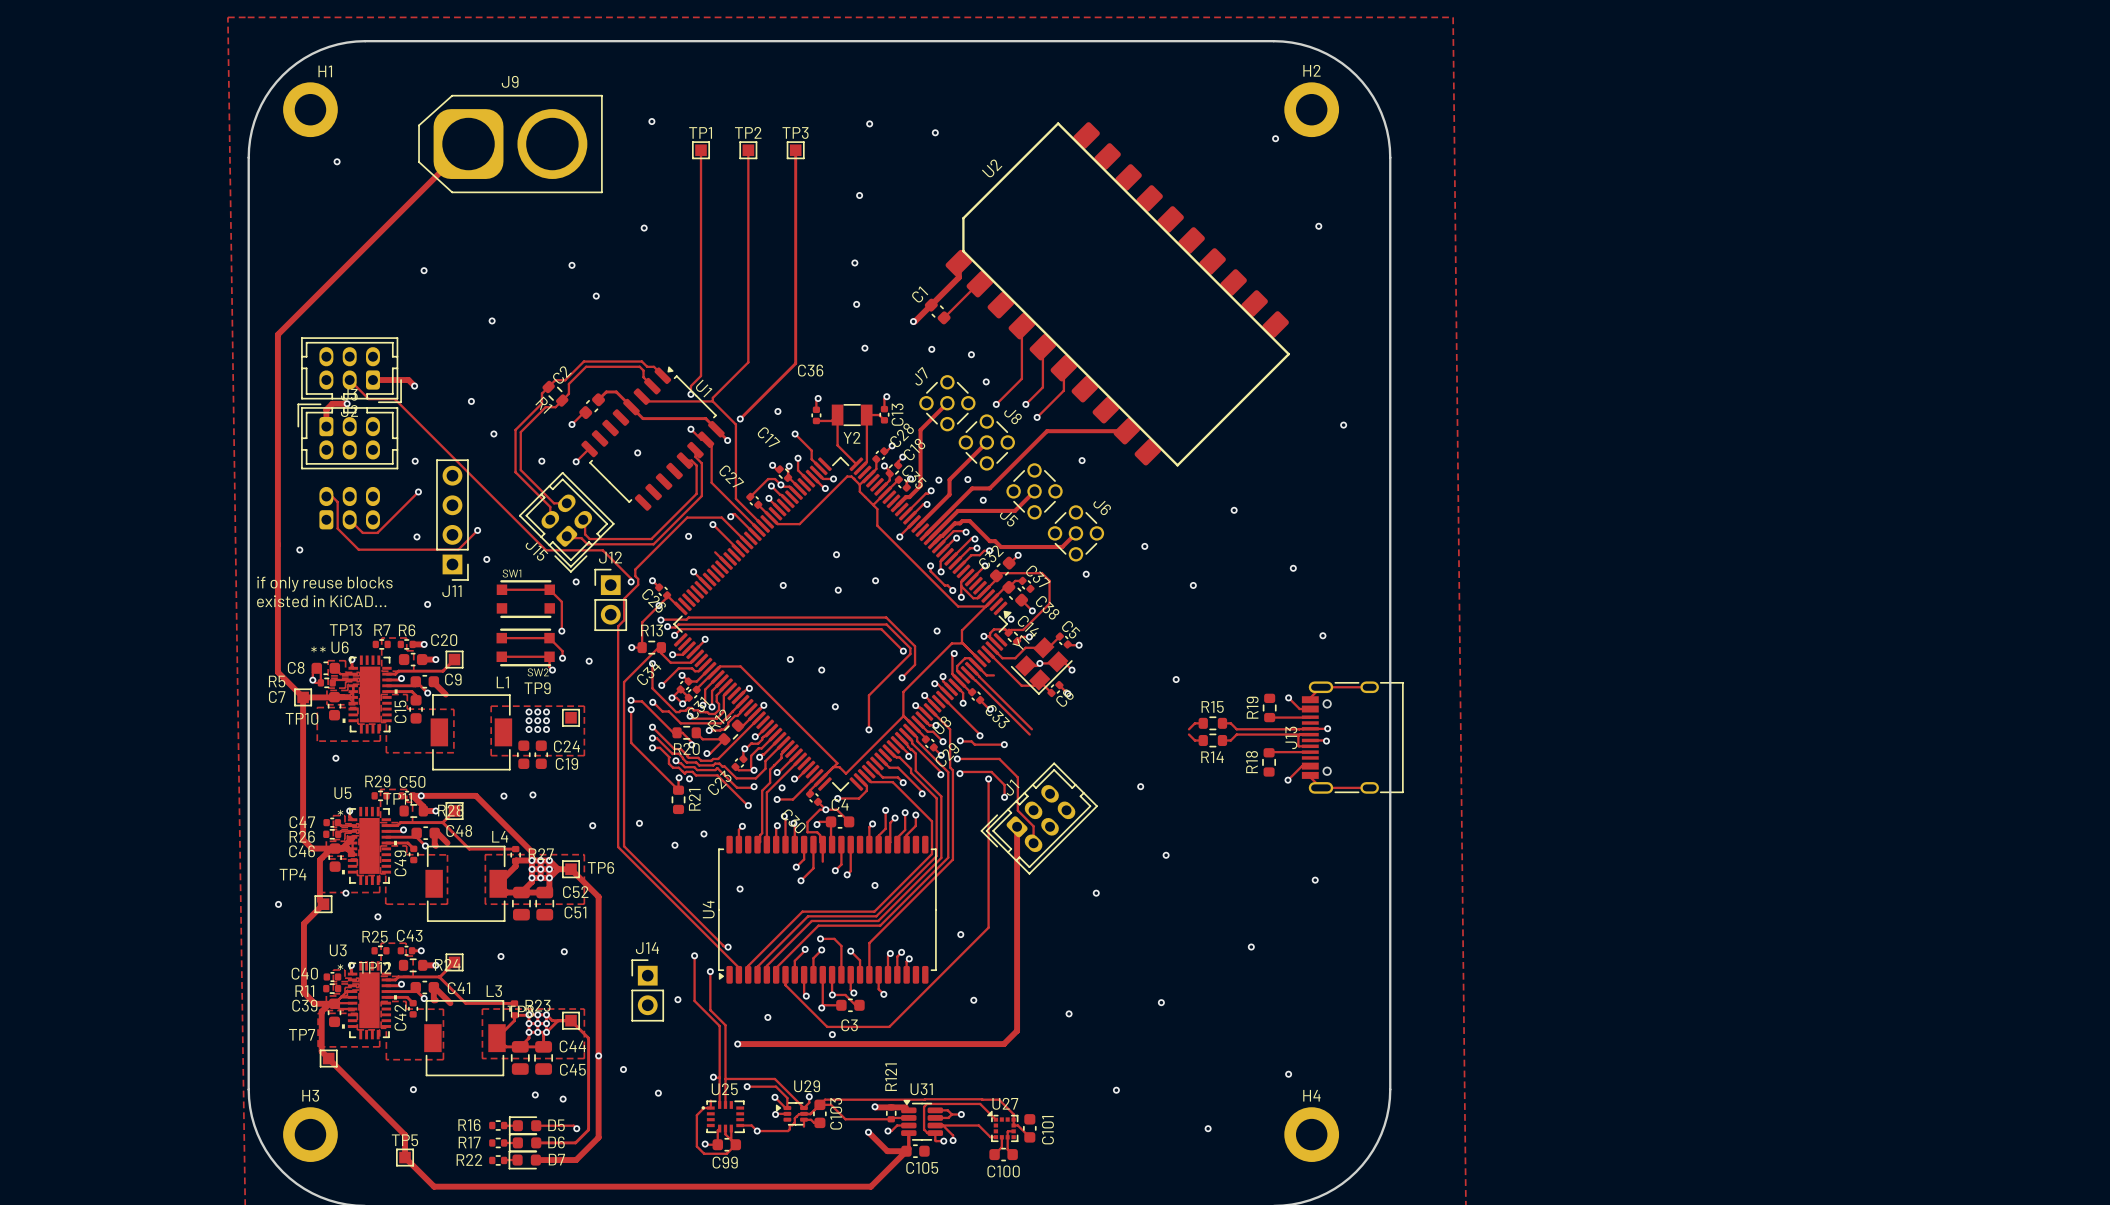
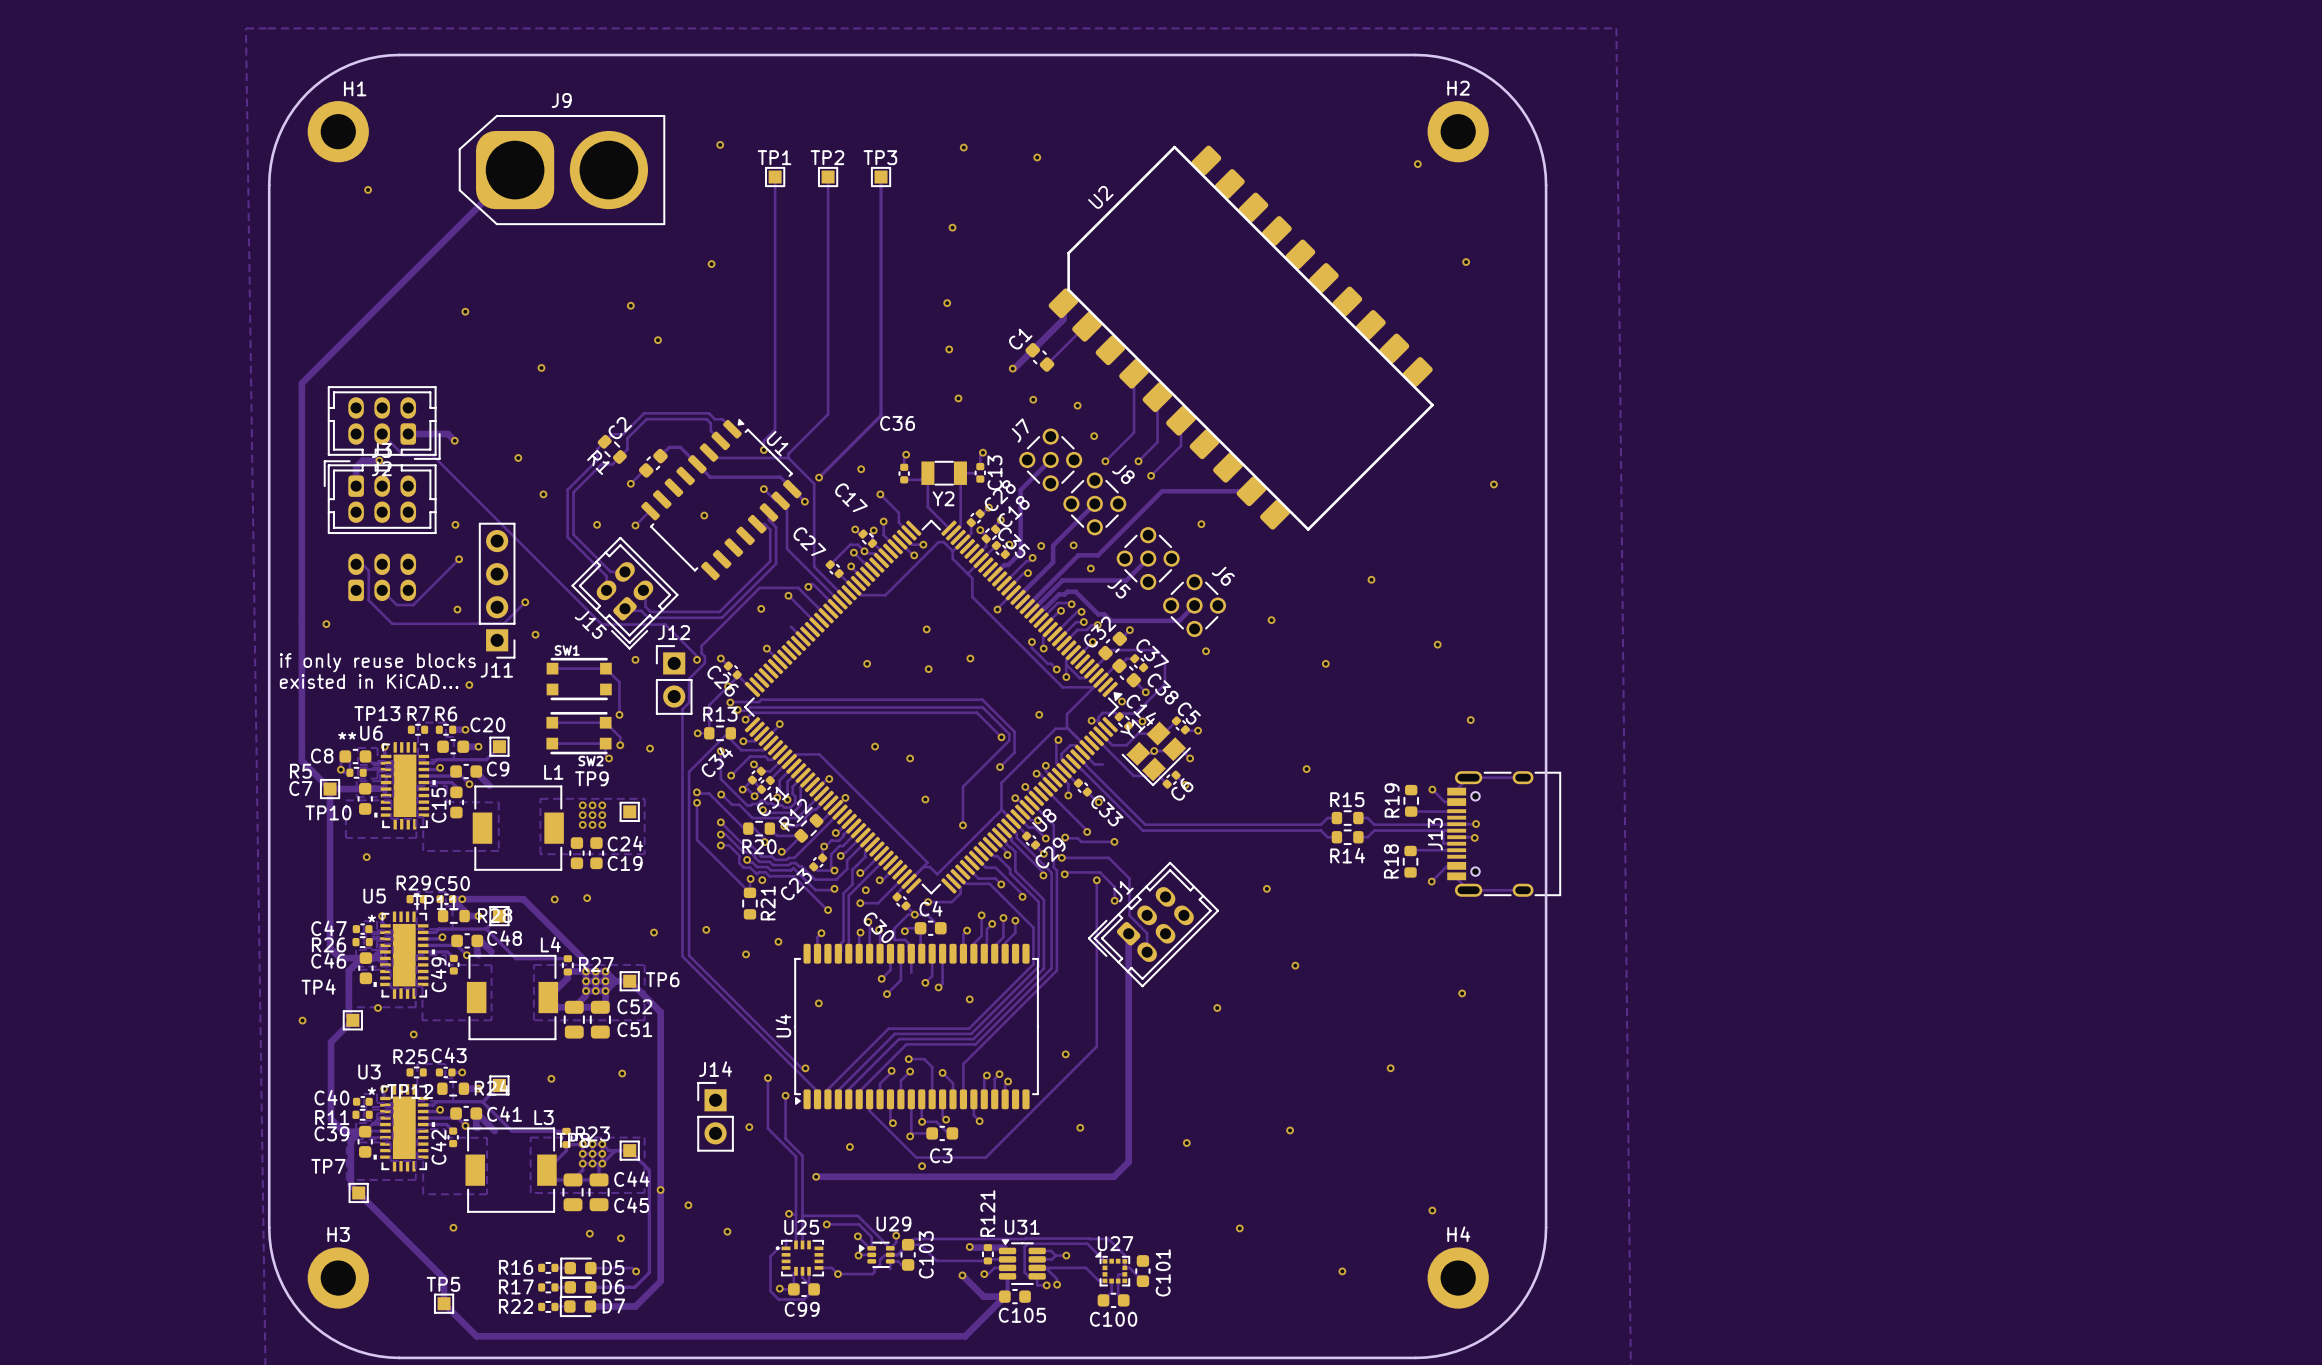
track: none -> (1145, 824) (1320, 824)
track: none -> (1142, 830) (1320, 830)

